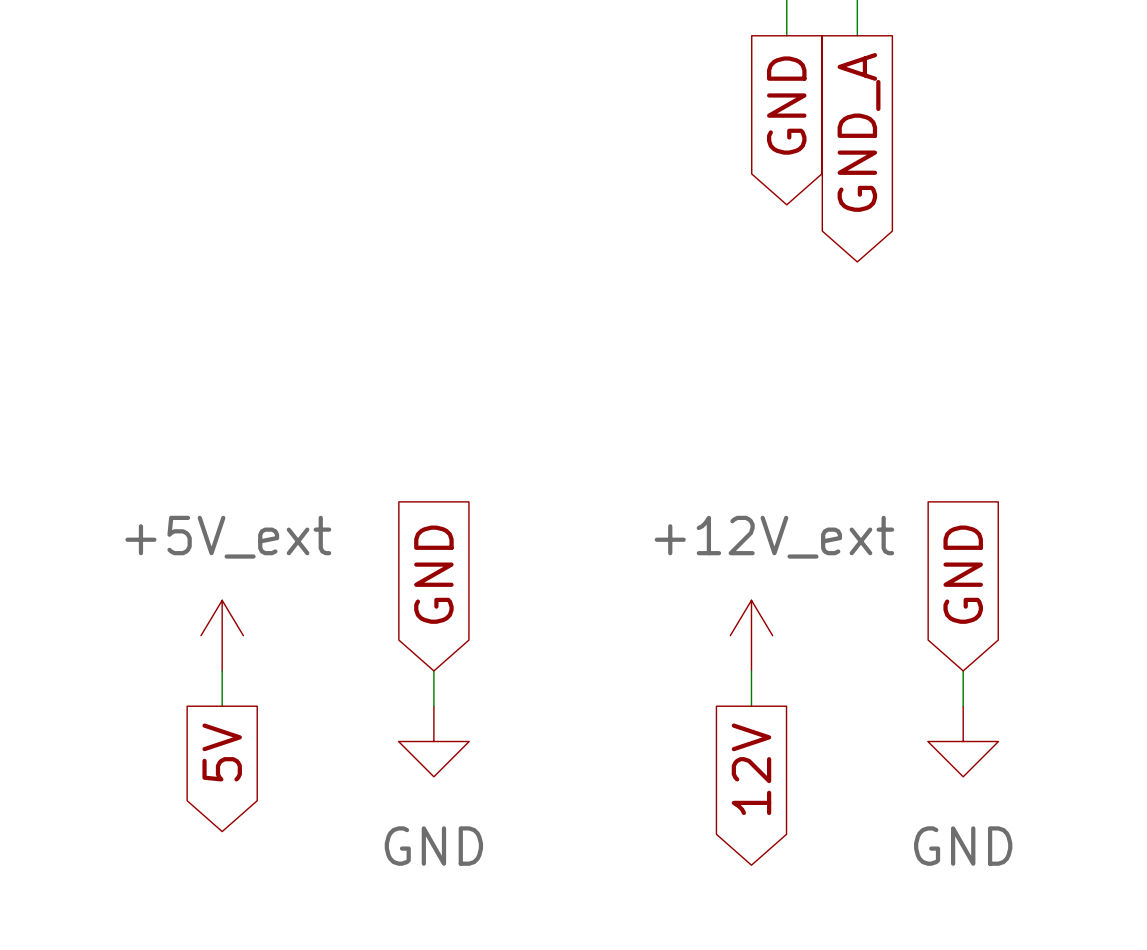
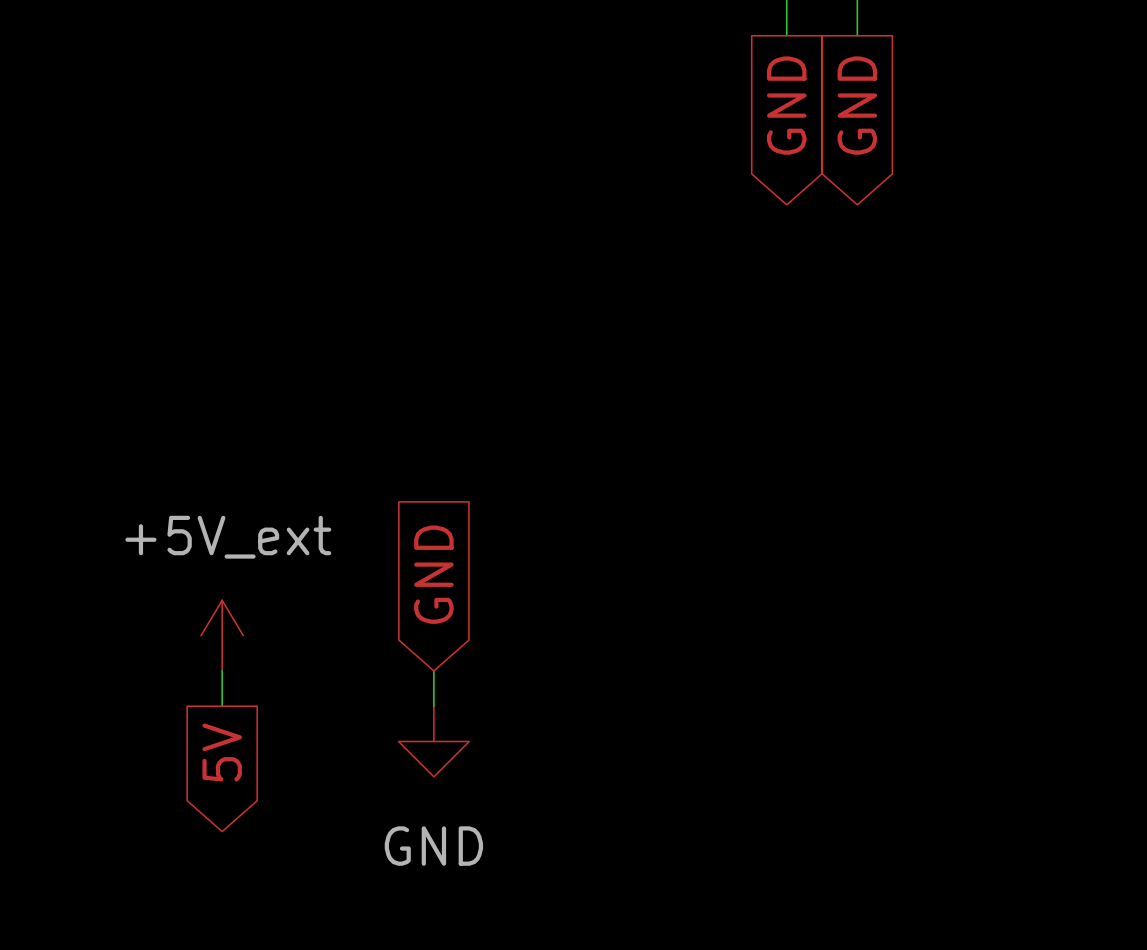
global label: GND_A (859, 132) -> GND (857, 105)
global label: GND (963, 574) -> none
power symbol: +12V_ext (751, 635) -> none
wire: (751, 670) (751, 706) -> none
wire: (963, 670) (963, 706) -> none
power symbol: GND (963, 741) -> none
global label: 12V (751, 769) -> none

